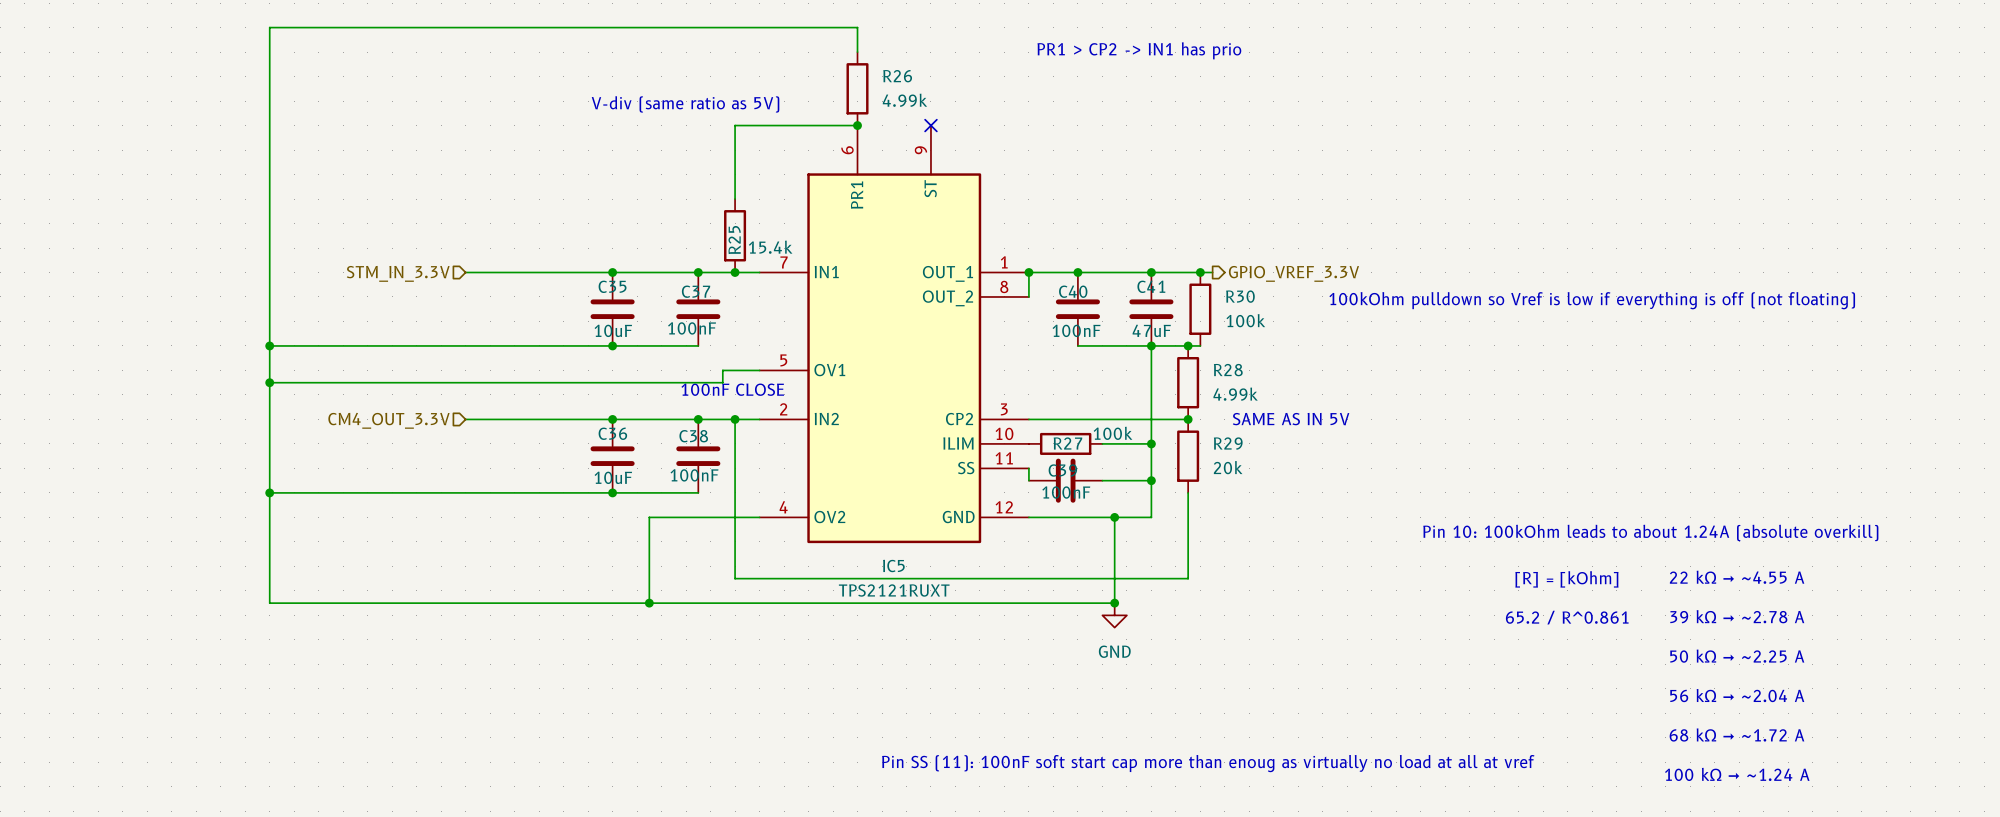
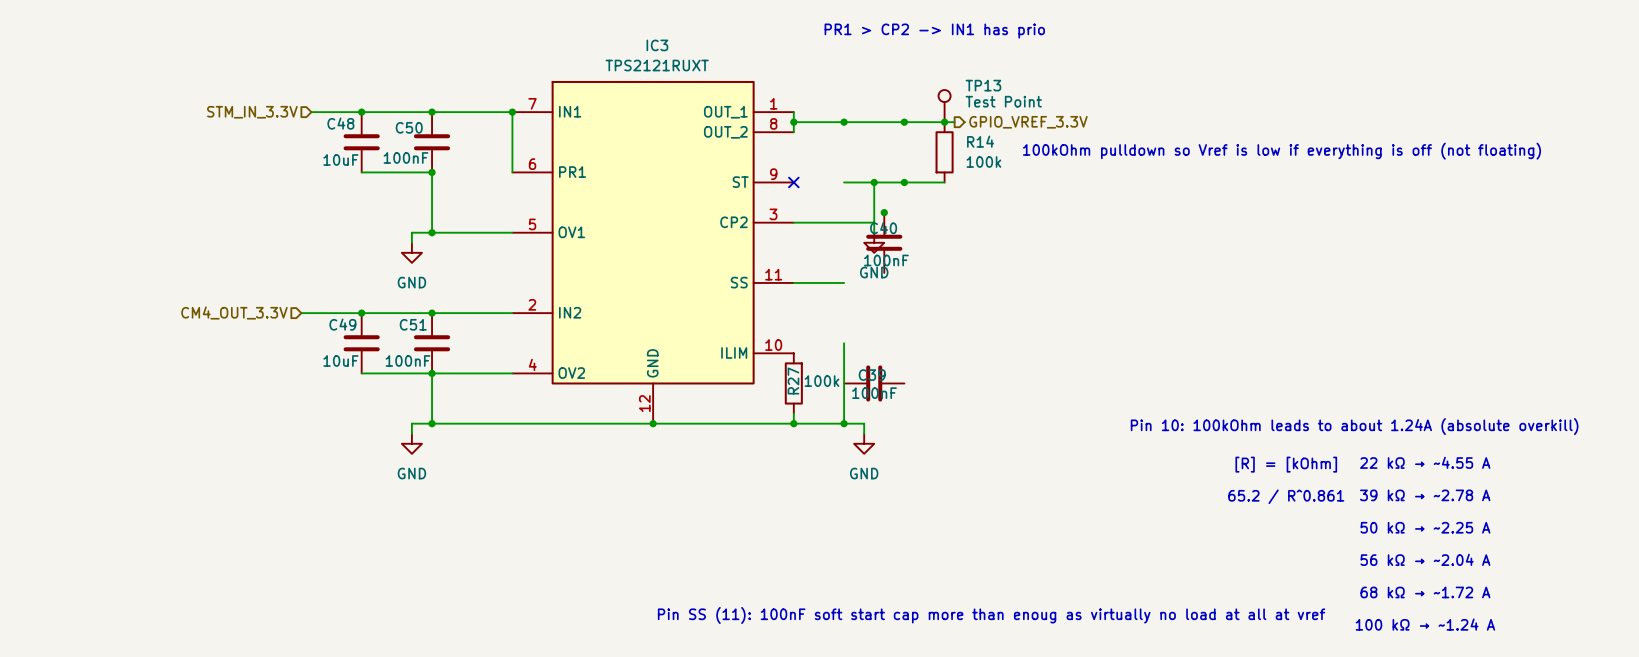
wire: (857, 52) (857, 27) (269, 27) (269, 603) (1114, 603) (1114, 517) -> none
R26: 4.99k (857, 88) -> none
text: V-div (same ratio as 5V) (685, 104) -> none
junction: (857, 125) -> none
no-connect mark: (930, 125) -> none
TP13: none -> Test Point (944, 106)
wire: none -> (311, 112) (512, 112) (512, 172)
junction: none -> (361, 112)
junction: none -> (432, 112)
junction: none -> (512, 112)
wire: none -> (793, 112) (793, 132)
wire: none -> (793, 122) (954, 122)
junction: none -> (793, 122)
junction: none -> (844, 122)
junction: none -> (904, 122)
junction: none -> (944, 122)
C48: none -> 10uF (361, 142)
C50: none -> 100nF (432, 142)
R14: none -> 100k (944, 152)
wire: none -> (361, 172) (432, 172) (432, 232)
junction: none -> (432, 172)
R25: 15.4k (735, 235) -> none
no-connect mark: none -> (793, 182)
wire: none -> (874, 182) (874, 232)
junction: none -> (874, 182)
junction: none -> (904, 182)
wire: (465, 272) (759, 272) -> none
junction: (612, 272) -> none
junction: (698, 272) -> none
junction: (735, 272) -> none
junction: (1028, 272) -> none
junction: (1151, 272) -> none
junction: (1200, 272) -> none
wire: (1212, 272) (1028, 272) (1028, 296) -> none
hierarchical label position: STM_IN_3.3V (398, 273) -> STM_IN_3.3V (252, 112)
hierarchical label position: GPIO_VREF_3.3V (1293, 273) -> GPIO_VREF_3.3V (1028, 122)
wire: none -> (793, 222) (874, 222)
junction: none -> (432, 232)
wire: none -> (512, 232) (411, 232) (411, 242)
text position: 100kOhm pulldown so Vref is low if everything is off (not floating) (1592, 300) -> 100kOhm pulldown so Vref is low if everything is off (not floating) (1282, 151)
C35: 10uF (612, 309) -> none
C37: 100nF (698, 309) -> none
power symbol: none -> GND (874, 242)
C41: 47uF (1151, 309) -> none
R30: 100k (1200, 309) -> none
IC3: none -> TPS2121RUXT (653, 252)
power symbol: none -> GND (411, 252)
IC5: TPS2121RUXT (894, 334) -> none
wire: (269, 345) (698, 345) -> none
junction: (269, 345) -> none
junction: (612, 345) -> none
wire: (1077, 345) (1200, 345) -> (844, 182) (944, 182)
wire: (1151, 345) (1151, 517) (1028, 517) -> none
junction: (1151, 345) -> none
junction: (1188, 345) -> none
wire: none -> (793, 282) (844, 282)
wire: (759, 370) (722, 370) (722, 382) (269, 382) -> none
junction: (269, 382) -> none
R28: 4.99k (1188, 382) -> none
text: 100nF CLOSE (732, 389) -> none
wire: none -> (301, 313) (512, 313)
junction: none -> (361, 313)
junction: none -> (432, 313)
wire: (465, 419) (759, 419) -> none
junction: (612, 419) -> none
junction: (698, 419) -> none
wire: (735, 419) (735, 578) (1188, 578) (1188, 492) -> none
junction: (735, 419) -> none
wire: (1028, 419) (1188, 419) -> none
junction: (1188, 419) -> none
text: SAME AS IN 5V (1291, 419) -> none
hierarchical label position: CM4_OUT_3.3V (388, 420) -> CM4_OUT_3.3V (234, 312)
C49: none -> 10uF (361, 343)
C51: none -> 100nF (432, 343)
wire: none -> (844, 343) (844, 373)
R27 rotation: 0° (1065, 443) -> 90° clockwise (793, 383)
R27 position: (1065, 443) -> (793, 383)
wire: (1102, 443) (1151, 443) -> none
junction: (1151, 443) -> none
C36: 10uF (612, 456) -> none
C38: 100nF (698, 456) -> none
R29: 20k (1188, 456) -> none
wire: none -> (361, 373) (512, 373)
wire: none -> (432, 373) (432, 423)
junction: none -> (432, 373)
wire: none -> (844, 383) (844, 423)
wire: (1102, 480) (1151, 480) -> none
junction: (1151, 480) -> none
wire: (269, 492) (698, 492) -> none
junction: (269, 492) -> none
junction: (612, 492) -> none
wire: (759, 517) (649, 517) (649, 603) -> none
junction: (1114, 517) -> none
junction: none -> (432, 423)
junction: none -> (653, 423)
junction: none -> (793, 423)
junction: none -> (844, 423)
wire: none -> (411, 433) (411, 423) (864, 423) (864, 433)
power symbol: none -> GND (411, 443)
junction: (649, 603) -> none
junction: (1114, 603) -> none
power symbol position: GND (1114, 615) -> GND (864, 443)

